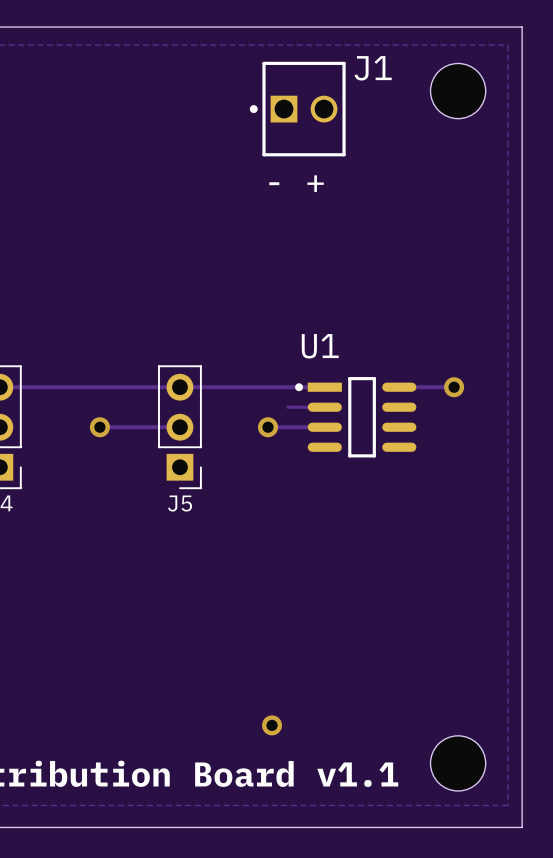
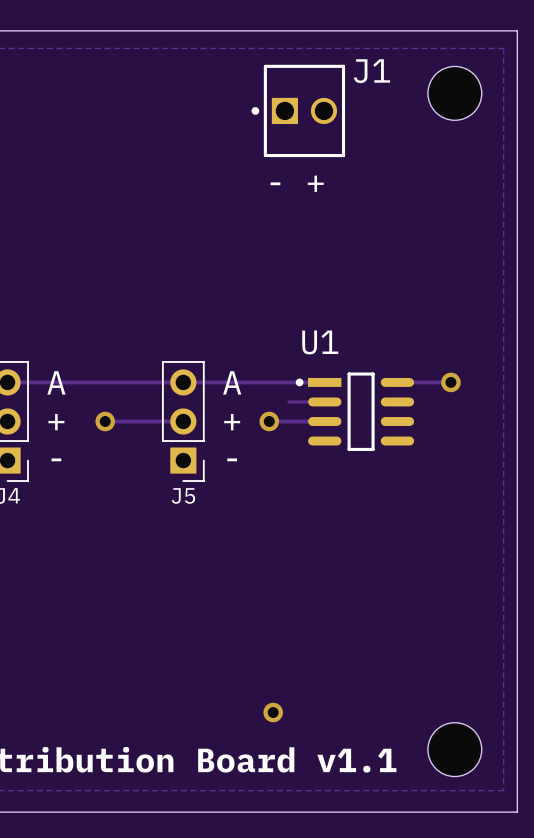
text: none -> A (56, 382)
text: none -> A (232, 382)
text: none -> + (56, 422)
text: none -> + (232, 422)
text: none -> - (56, 459)
text: none -> - (232, 459)

